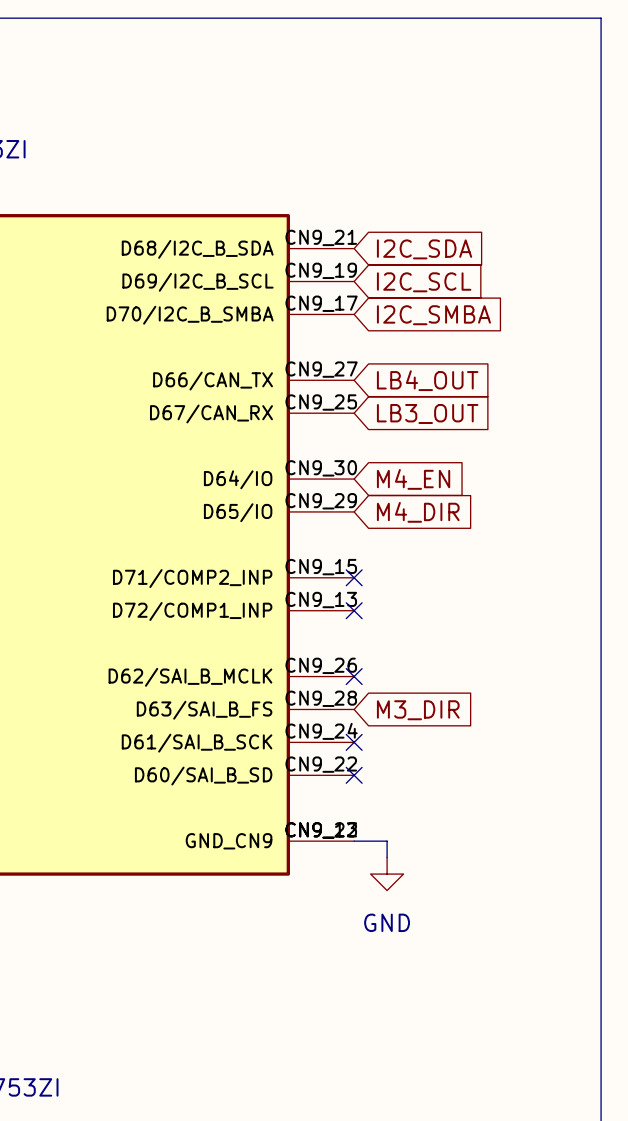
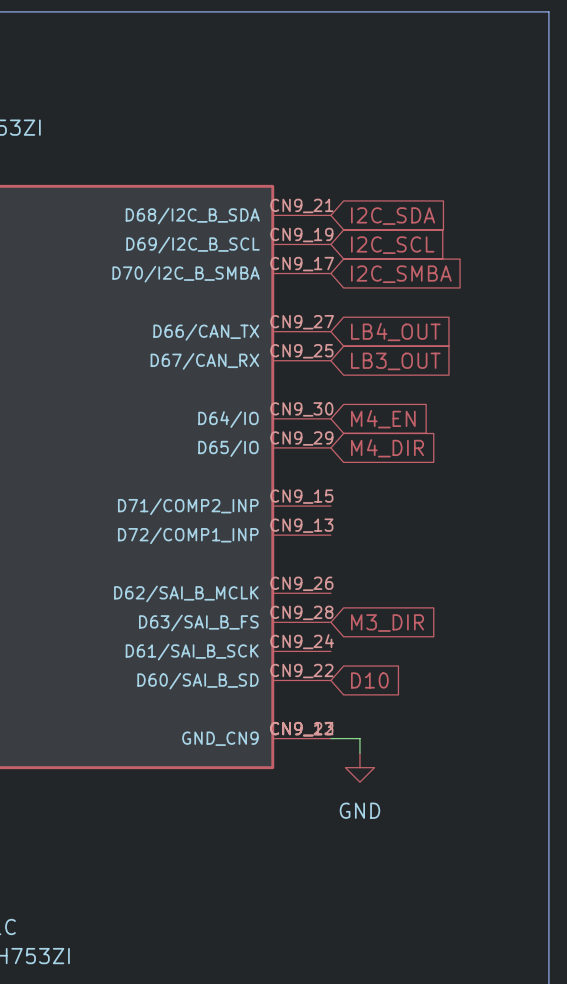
no-connect mark: (354, 577) -> none
no-connect mark: (354, 610) -> none
no-connect mark: (354, 676) -> none
no-connect mark: (354, 742) -> none
no-connect mark: (354, 775) -> none
global label: none -> D10 (369, 680)

